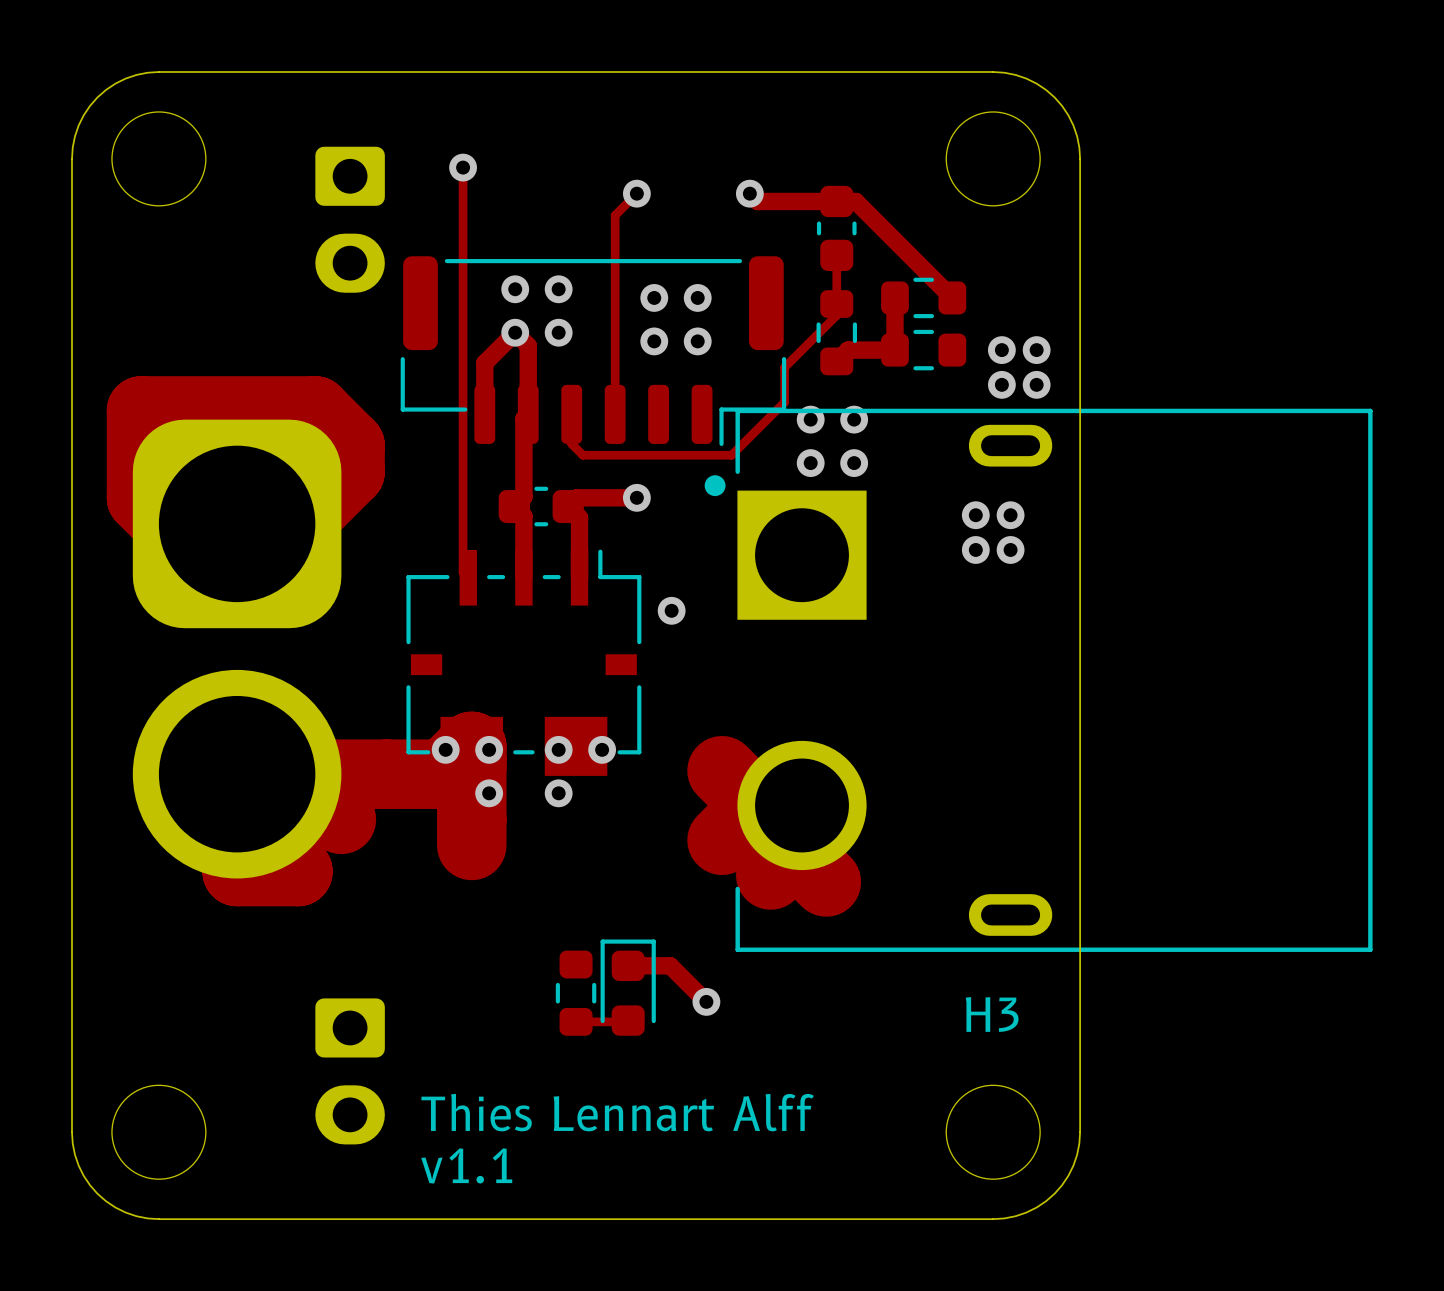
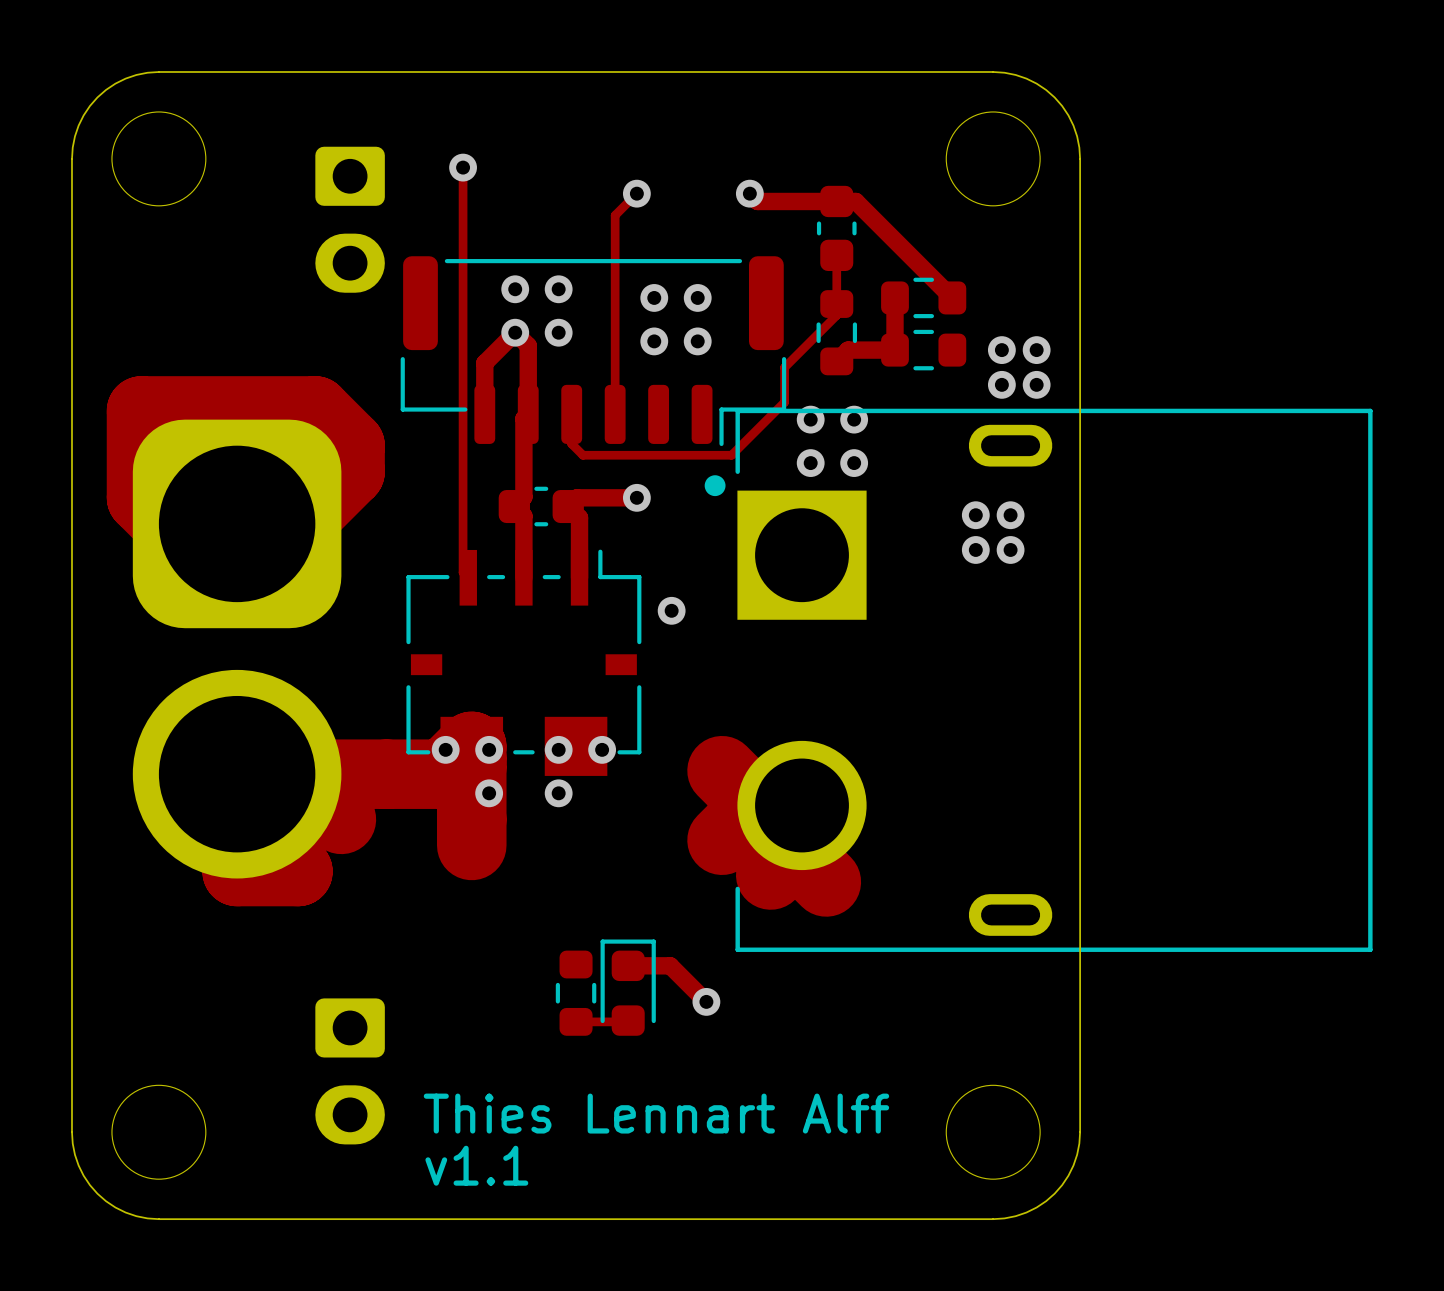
H3 name: H3 (992, 1014) -> none

